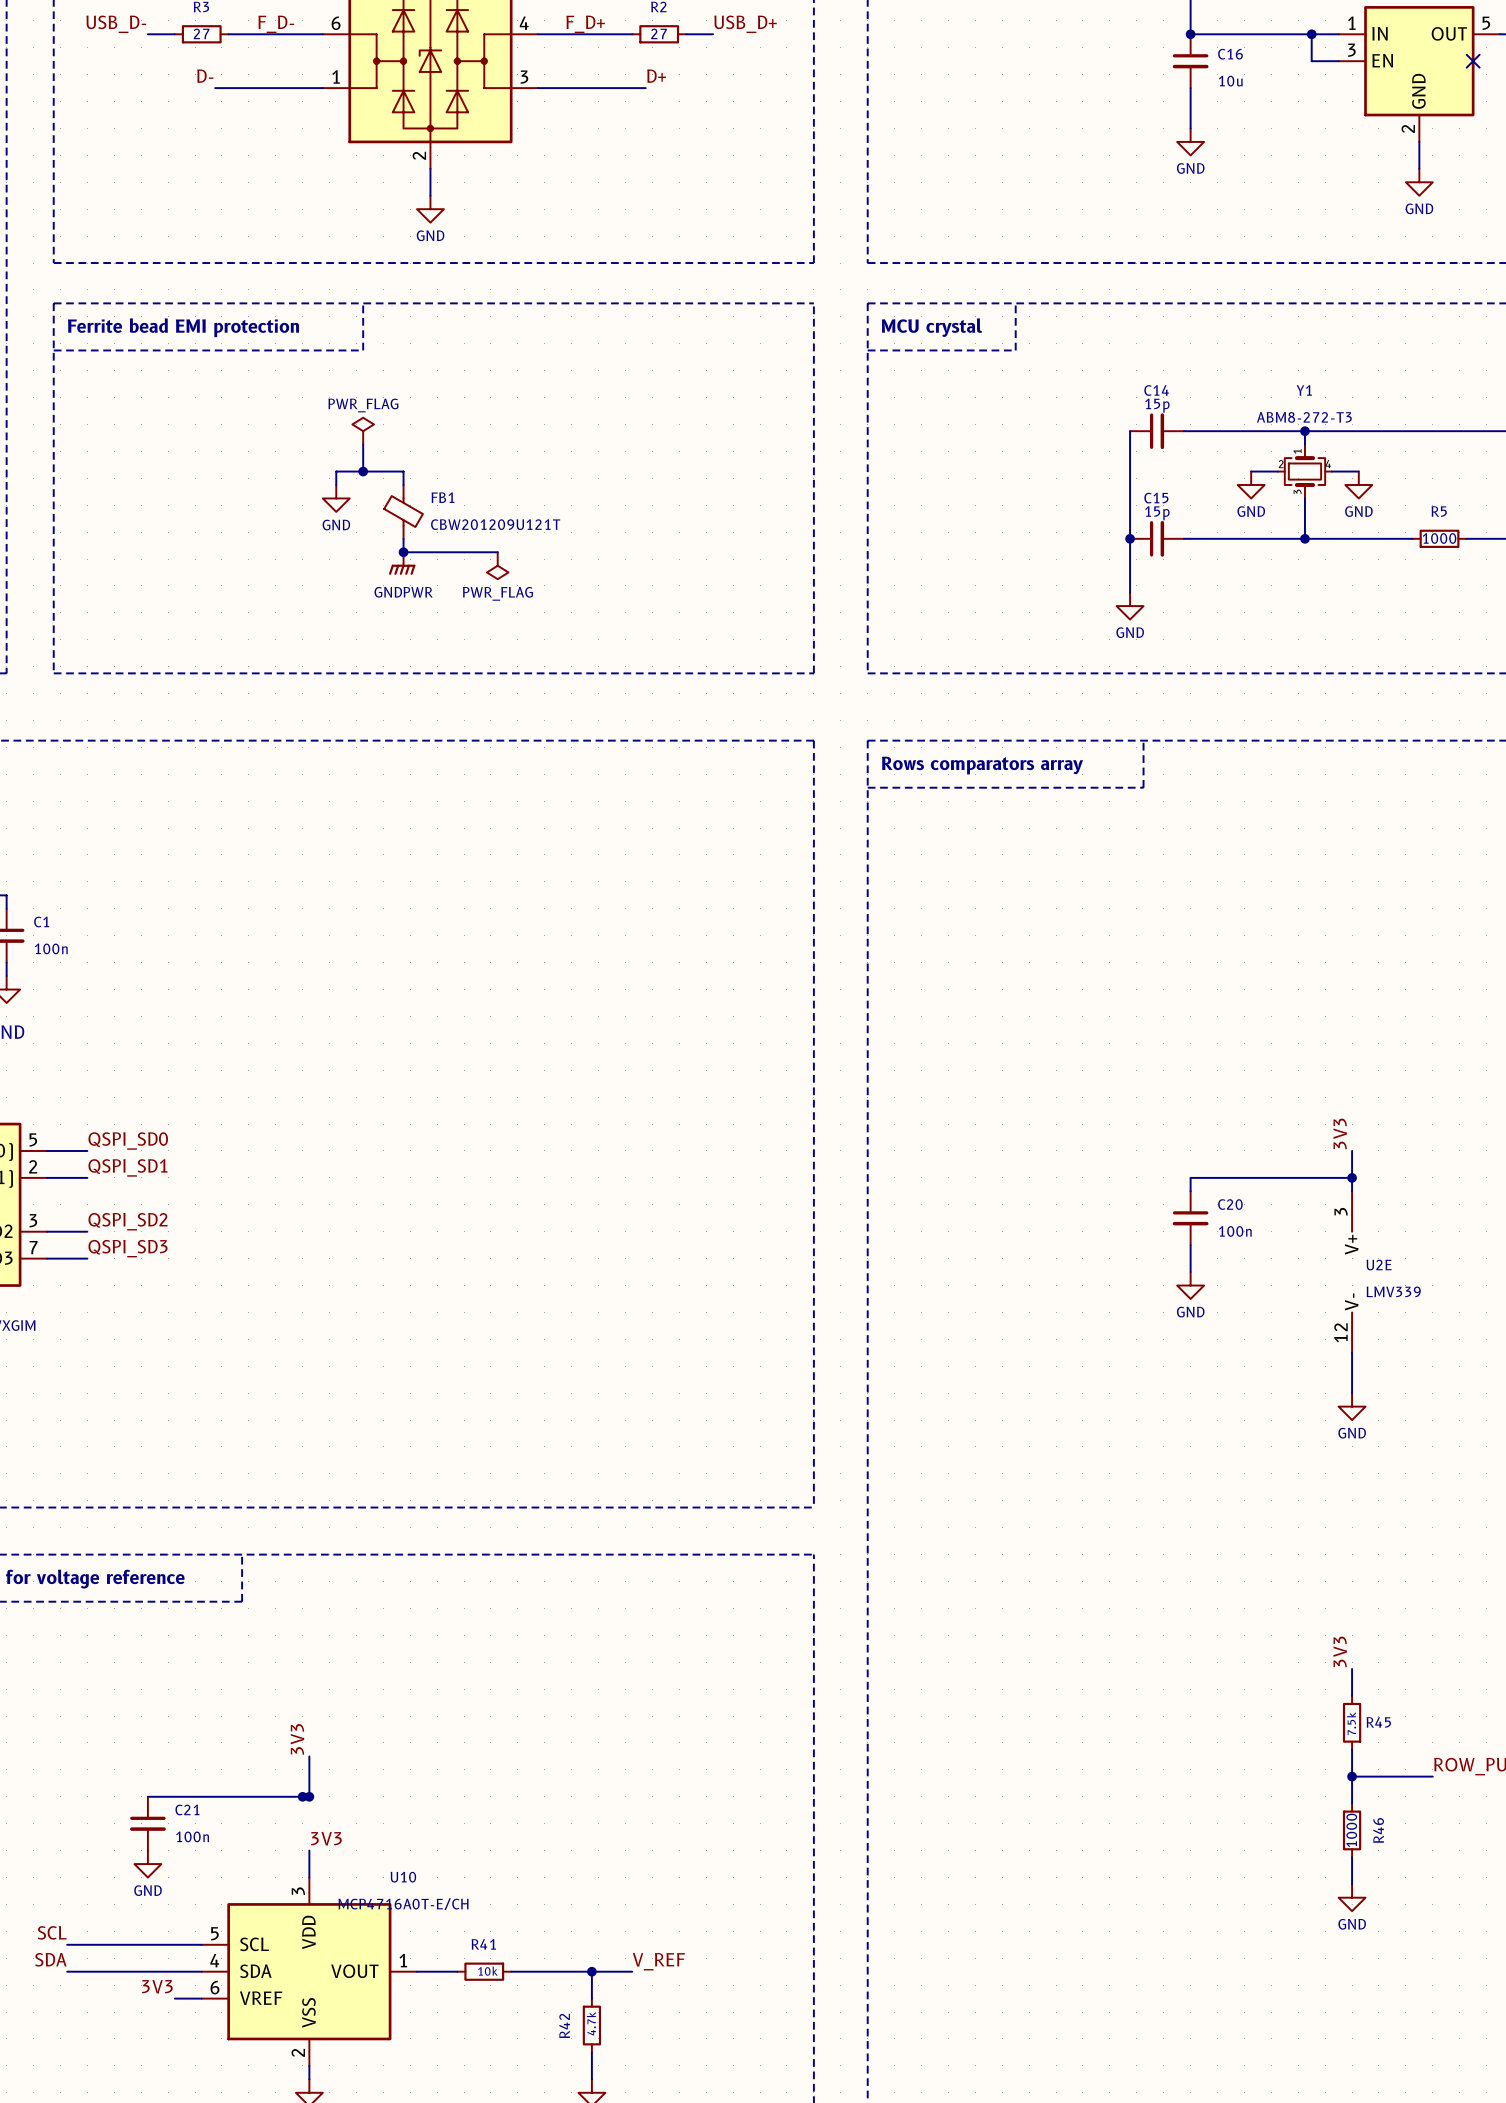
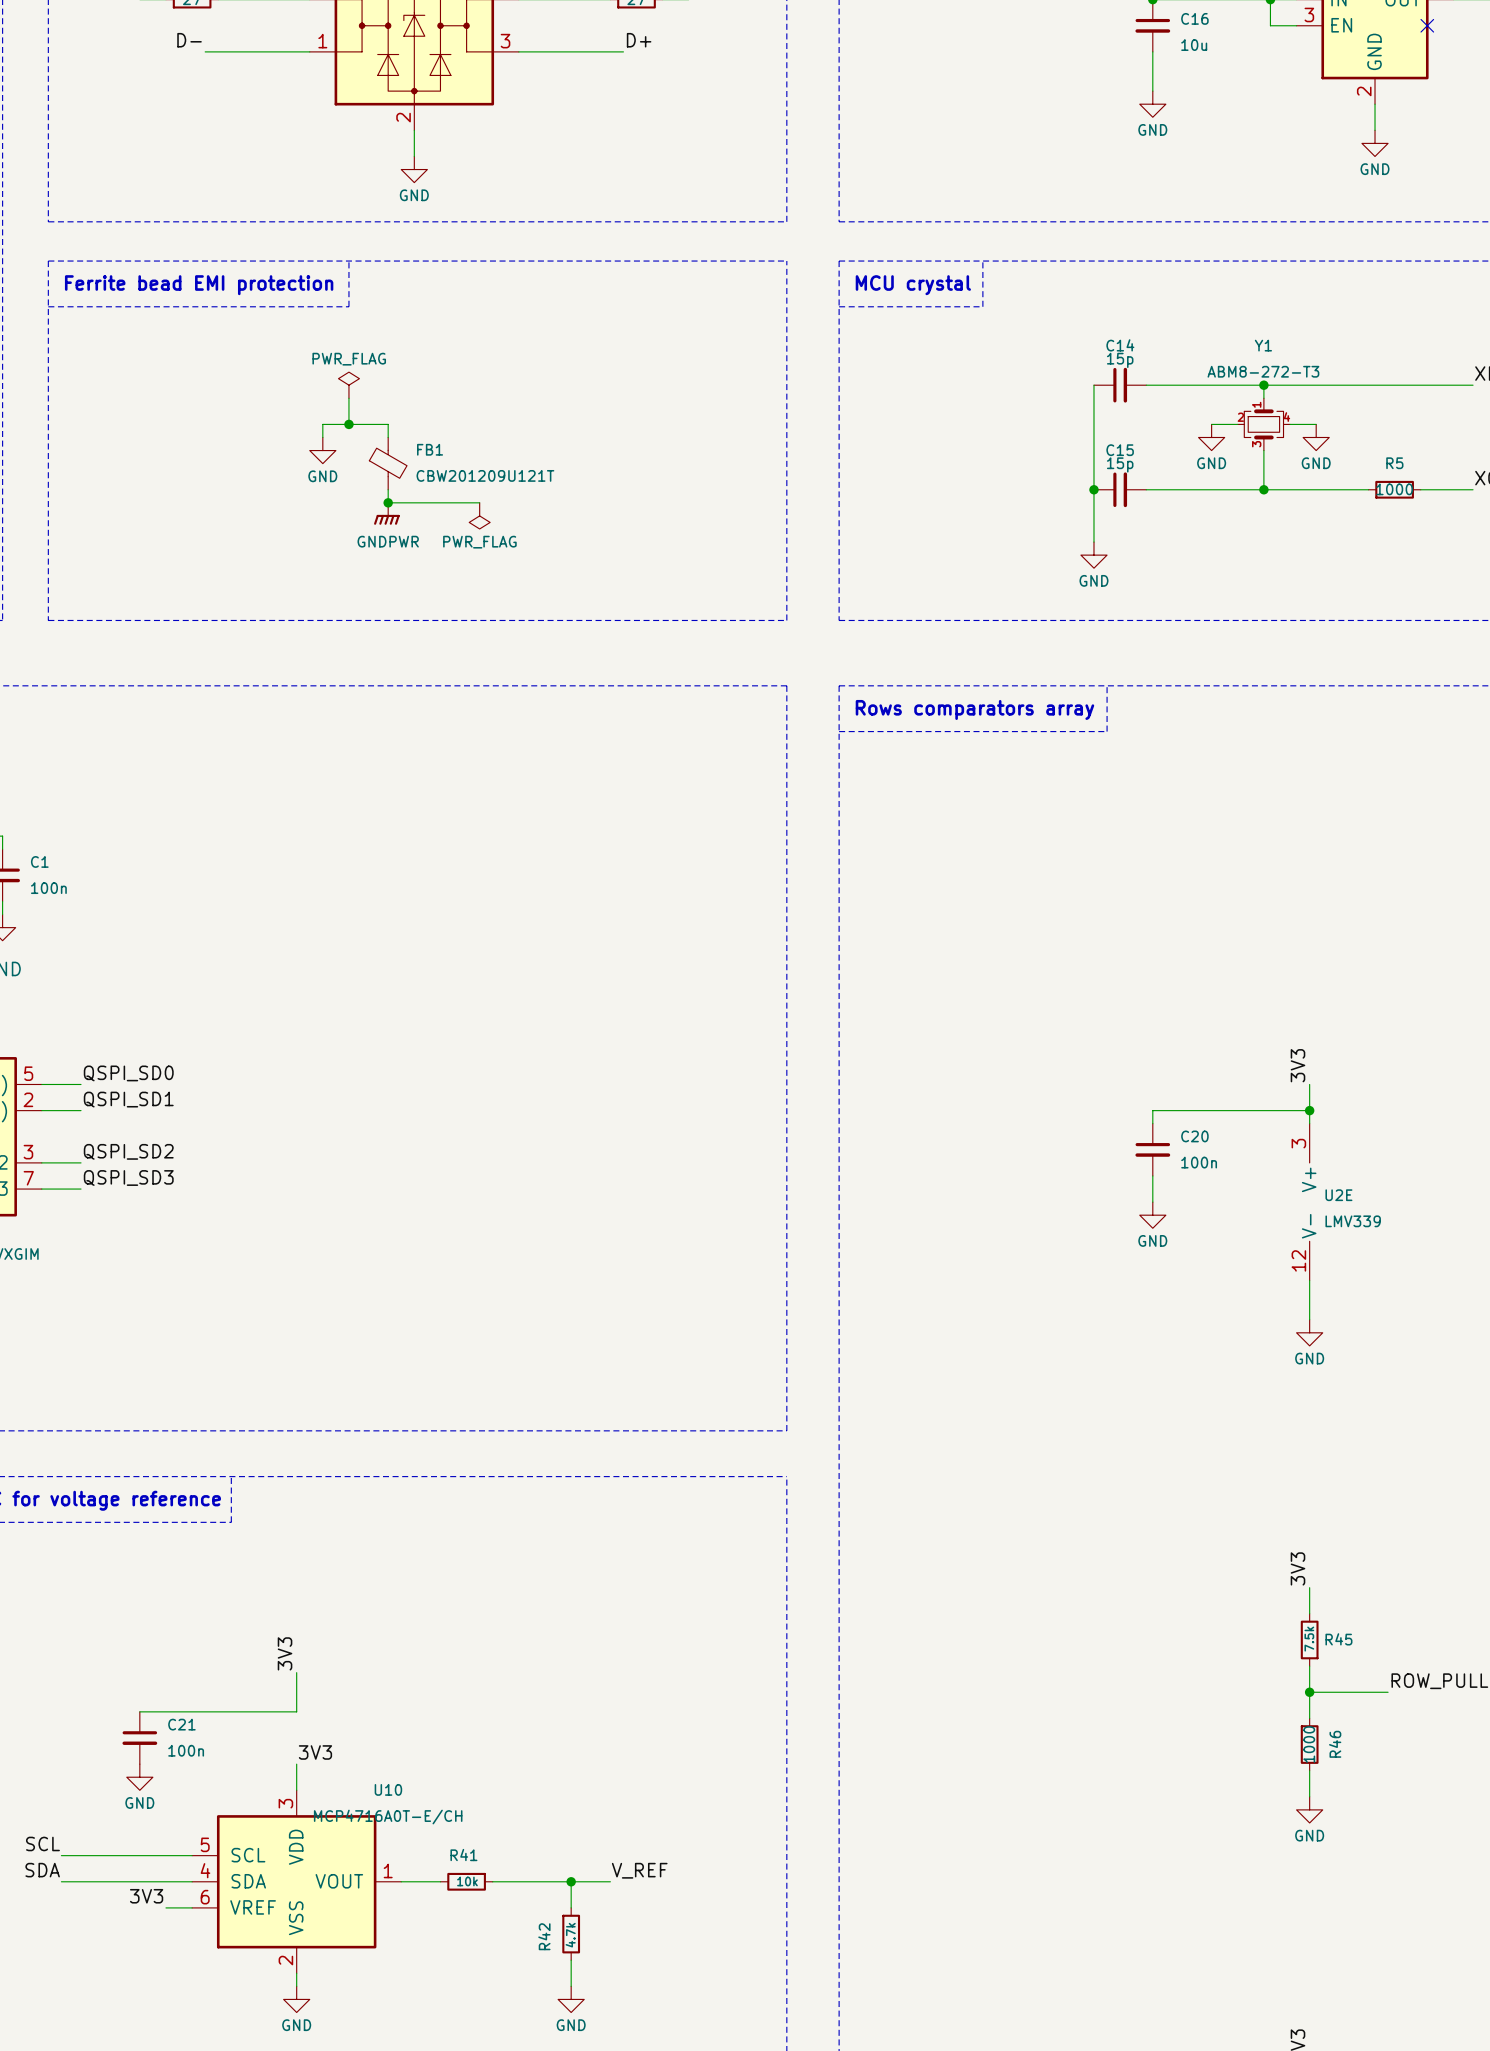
junction: (302, 1796) -> none
junction: (309, 1796) -> none

